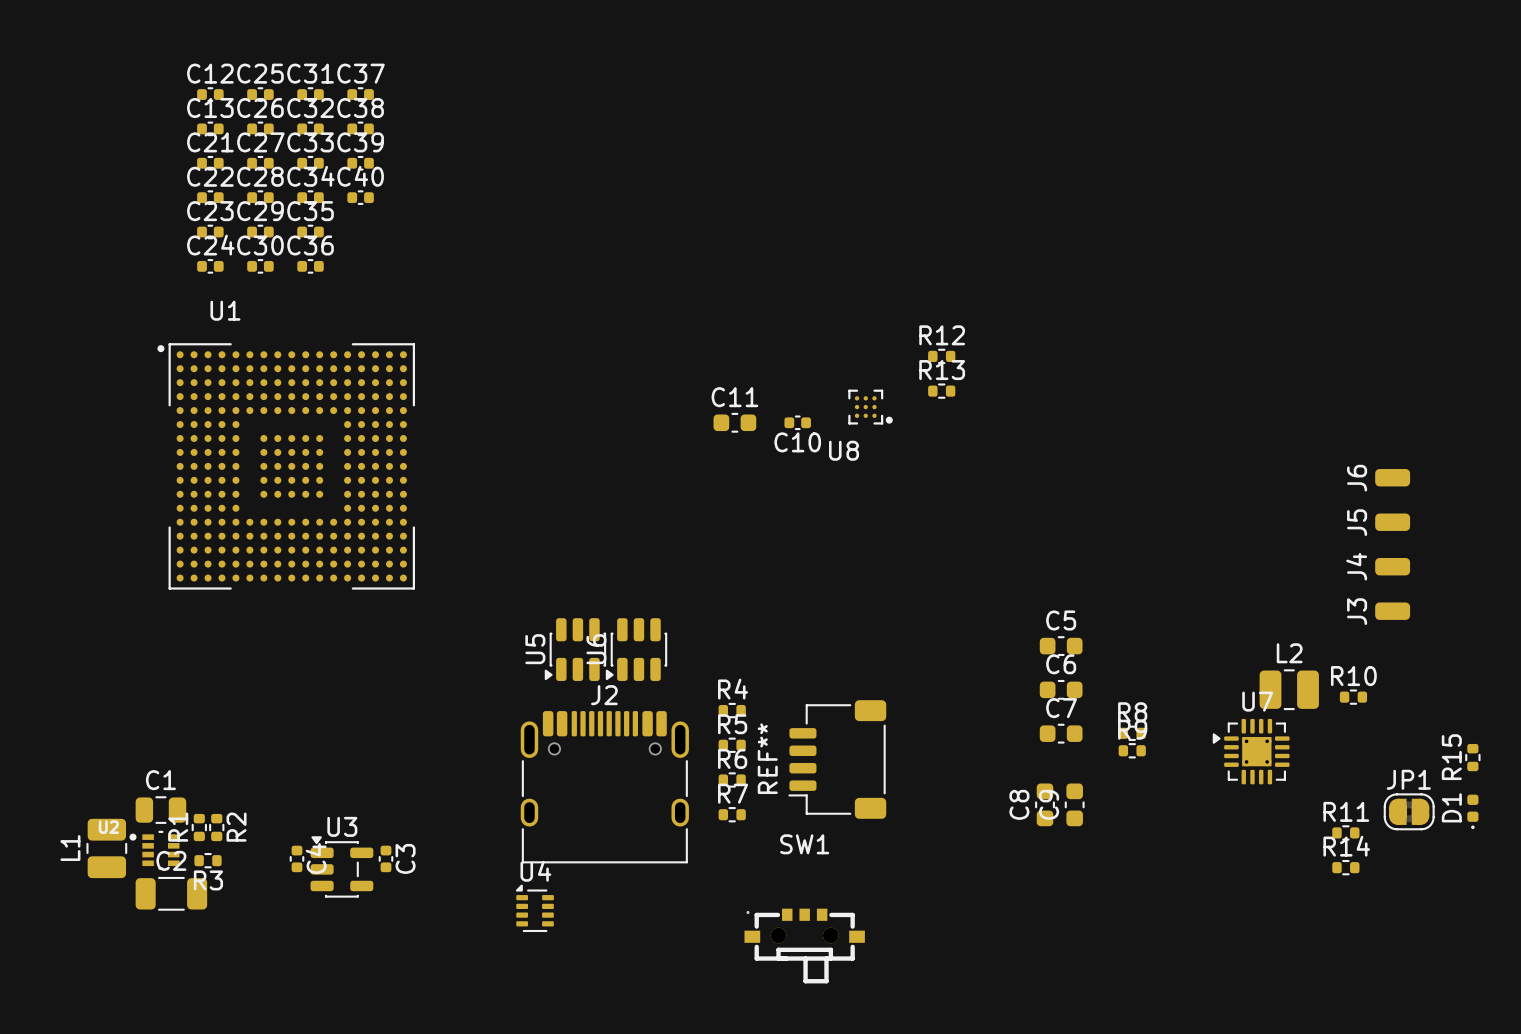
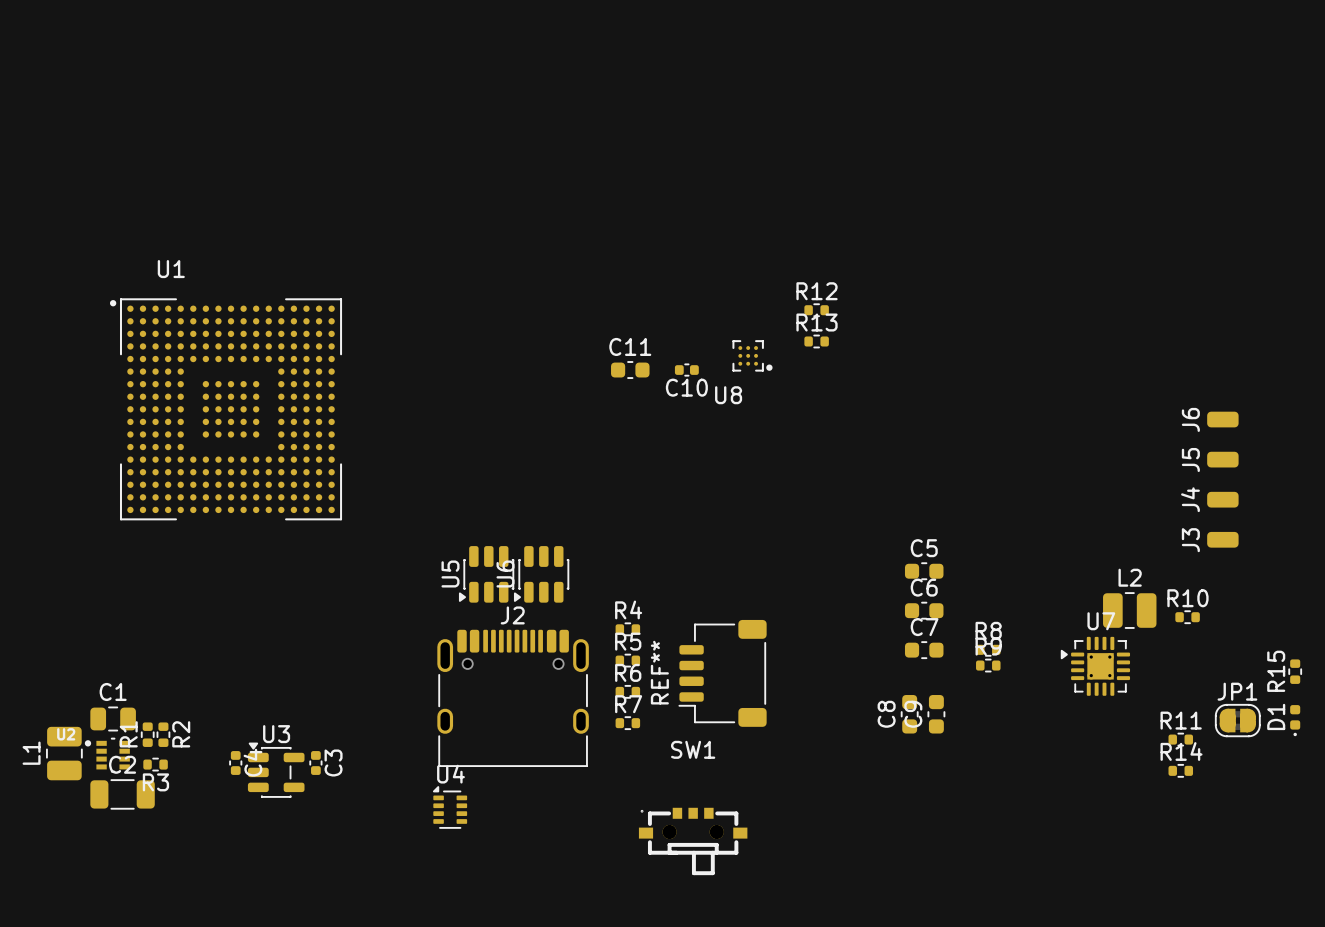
C12: (210, 94) -> none
C25: (260, 94) -> none
C31: (310, 94) -> none
C37: (360, 94) -> none
C13: (210, 128) -> none
C26: (260, 128) -> none
C32: (310, 128) -> none
C38: (360, 128) -> none
C21: (210, 163) -> none
C27: (260, 163) -> none
C33: (310, 163) -> none
C39: (360, 163) -> none
C22: (210, 197) -> none
C28: (260, 197) -> none
C34: (310, 197) -> none
C40: (360, 197) -> none
C23: (210, 232) -> none
C29: (260, 232) -> none
C35: (310, 232) -> none
C24: (210, 266) -> none
C30: (260, 266) -> none
C36: (310, 266) -> none

